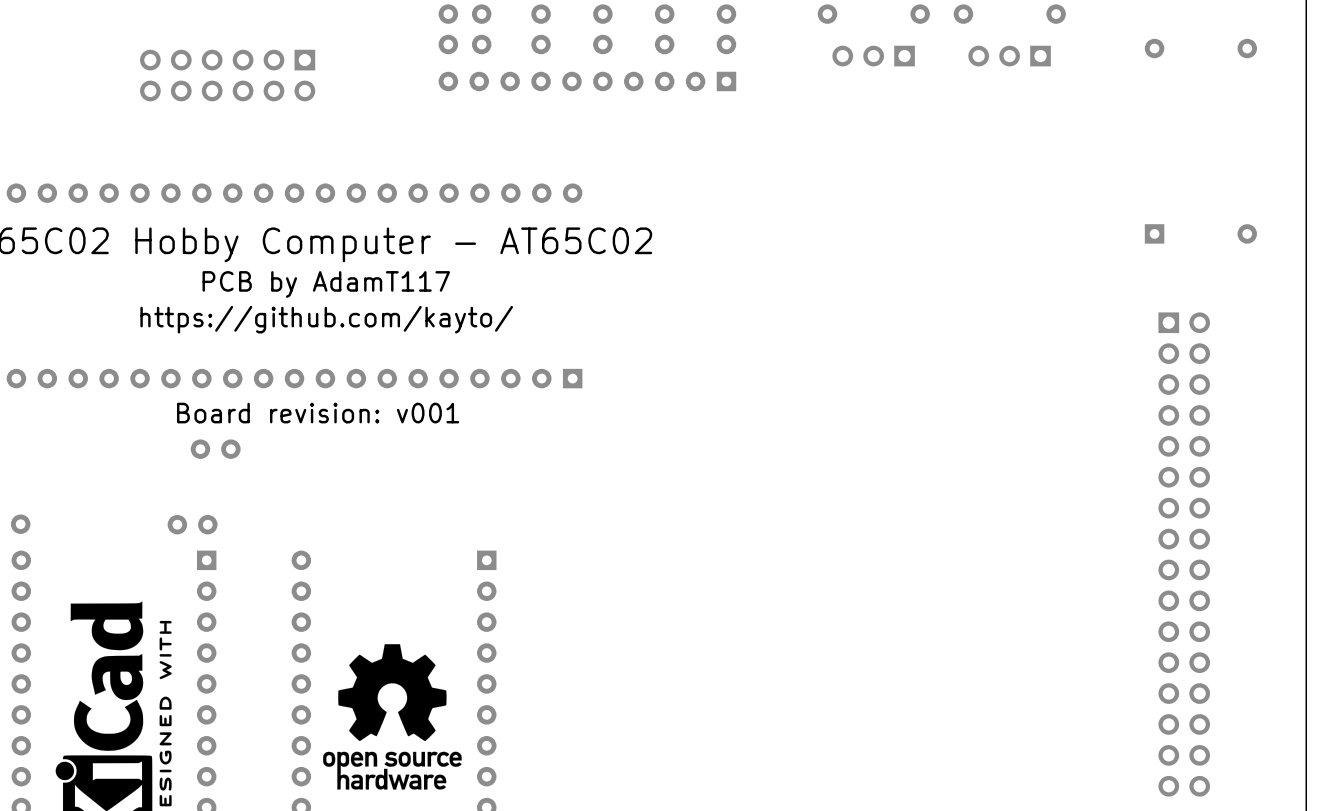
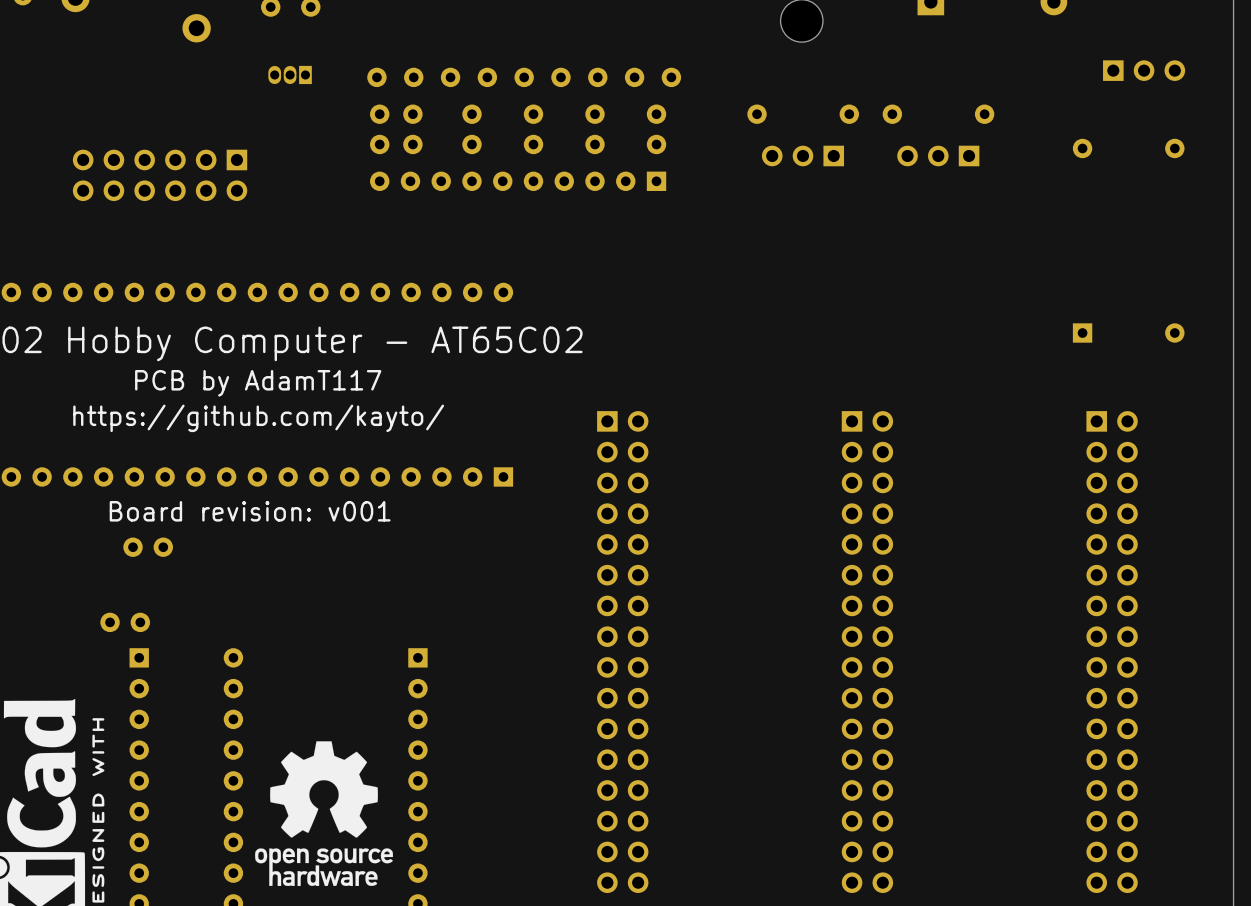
part: none -> (622, 652)
part: none -> (867, 652)

